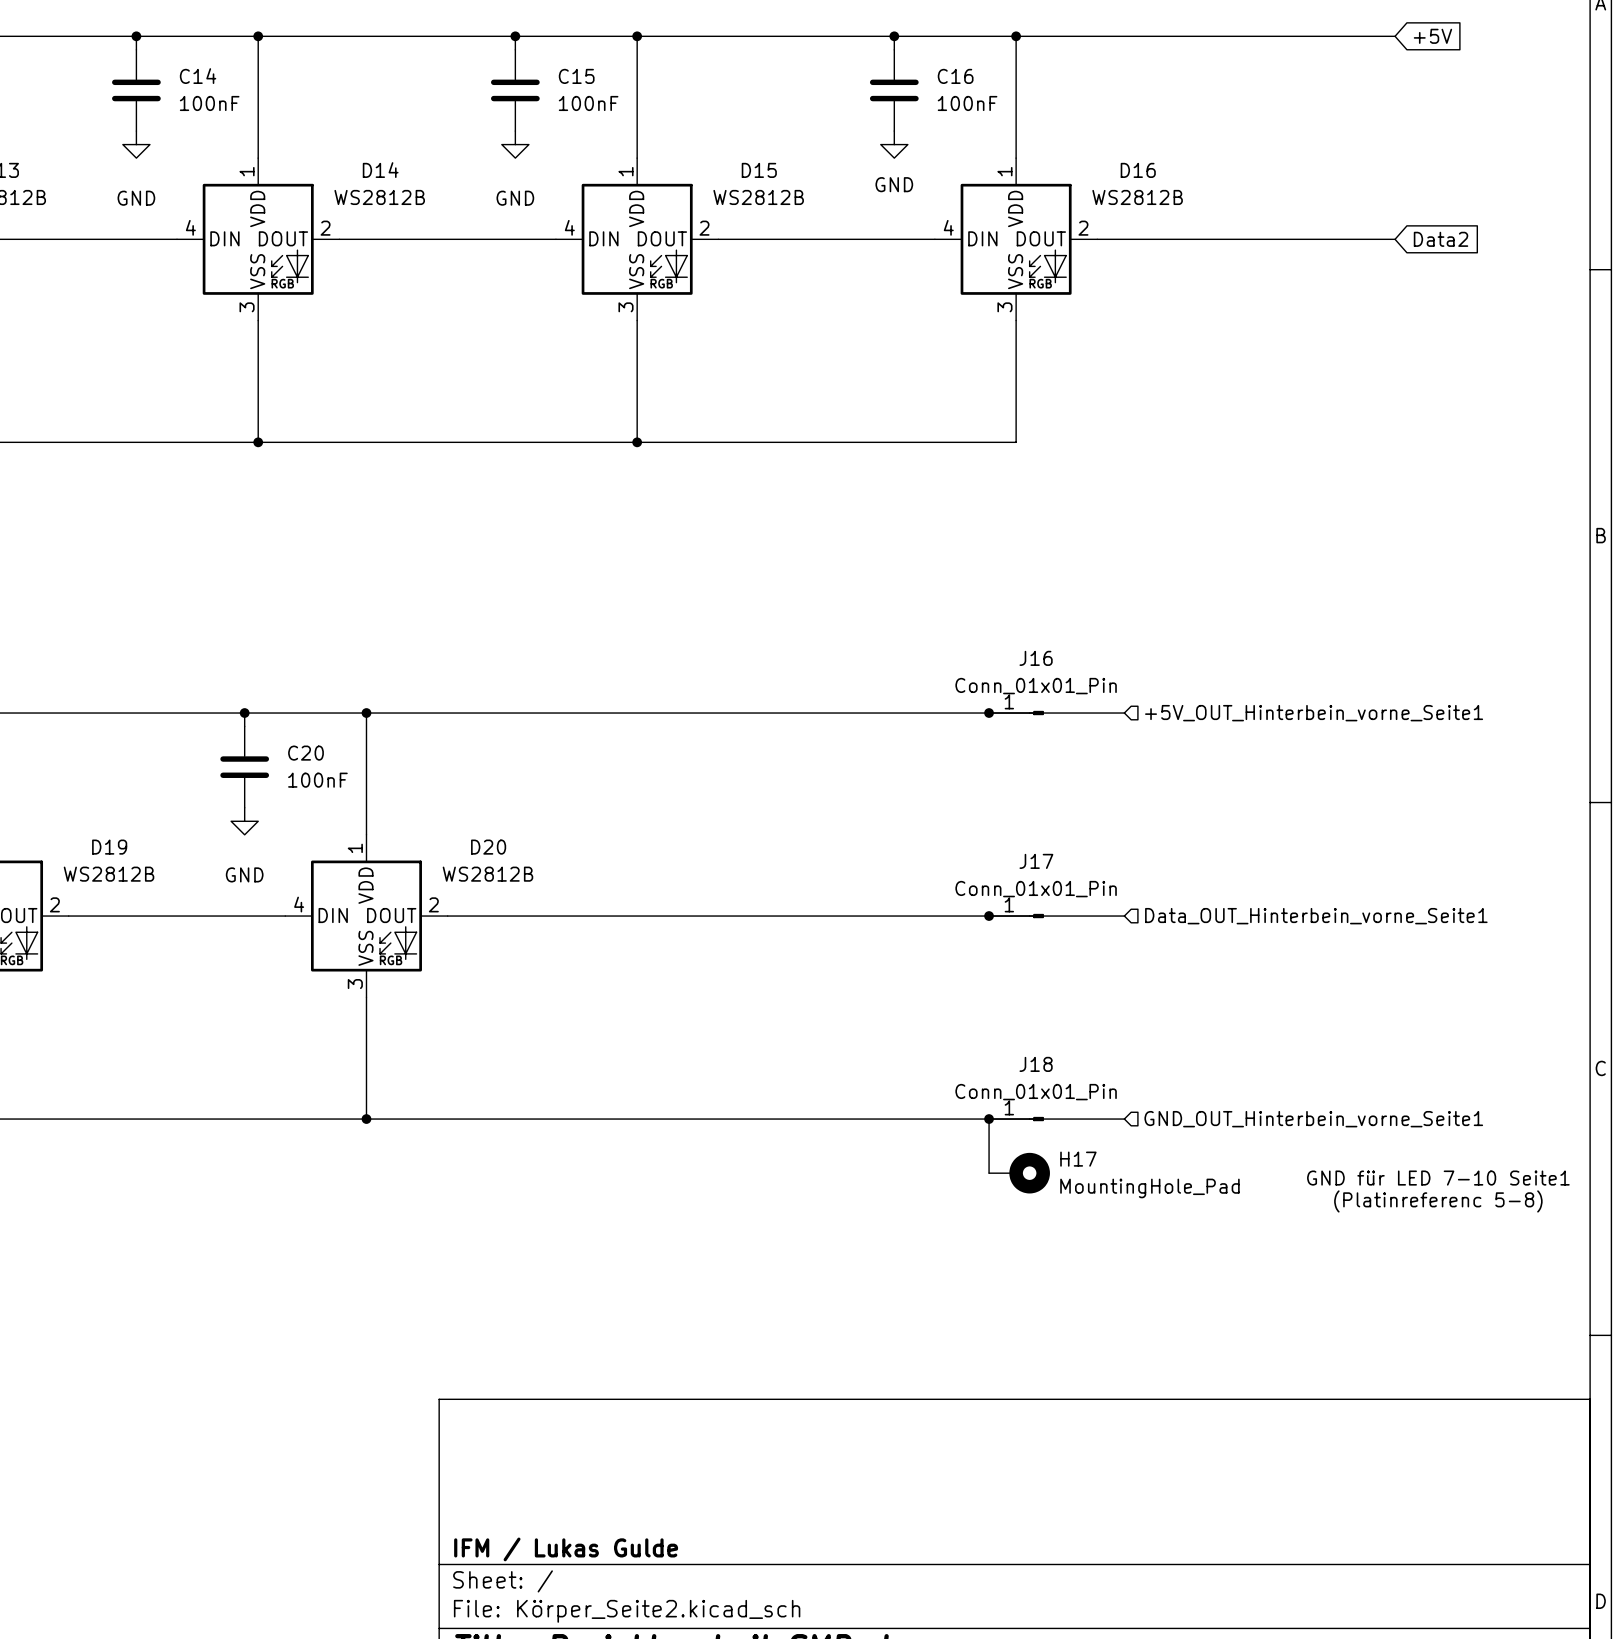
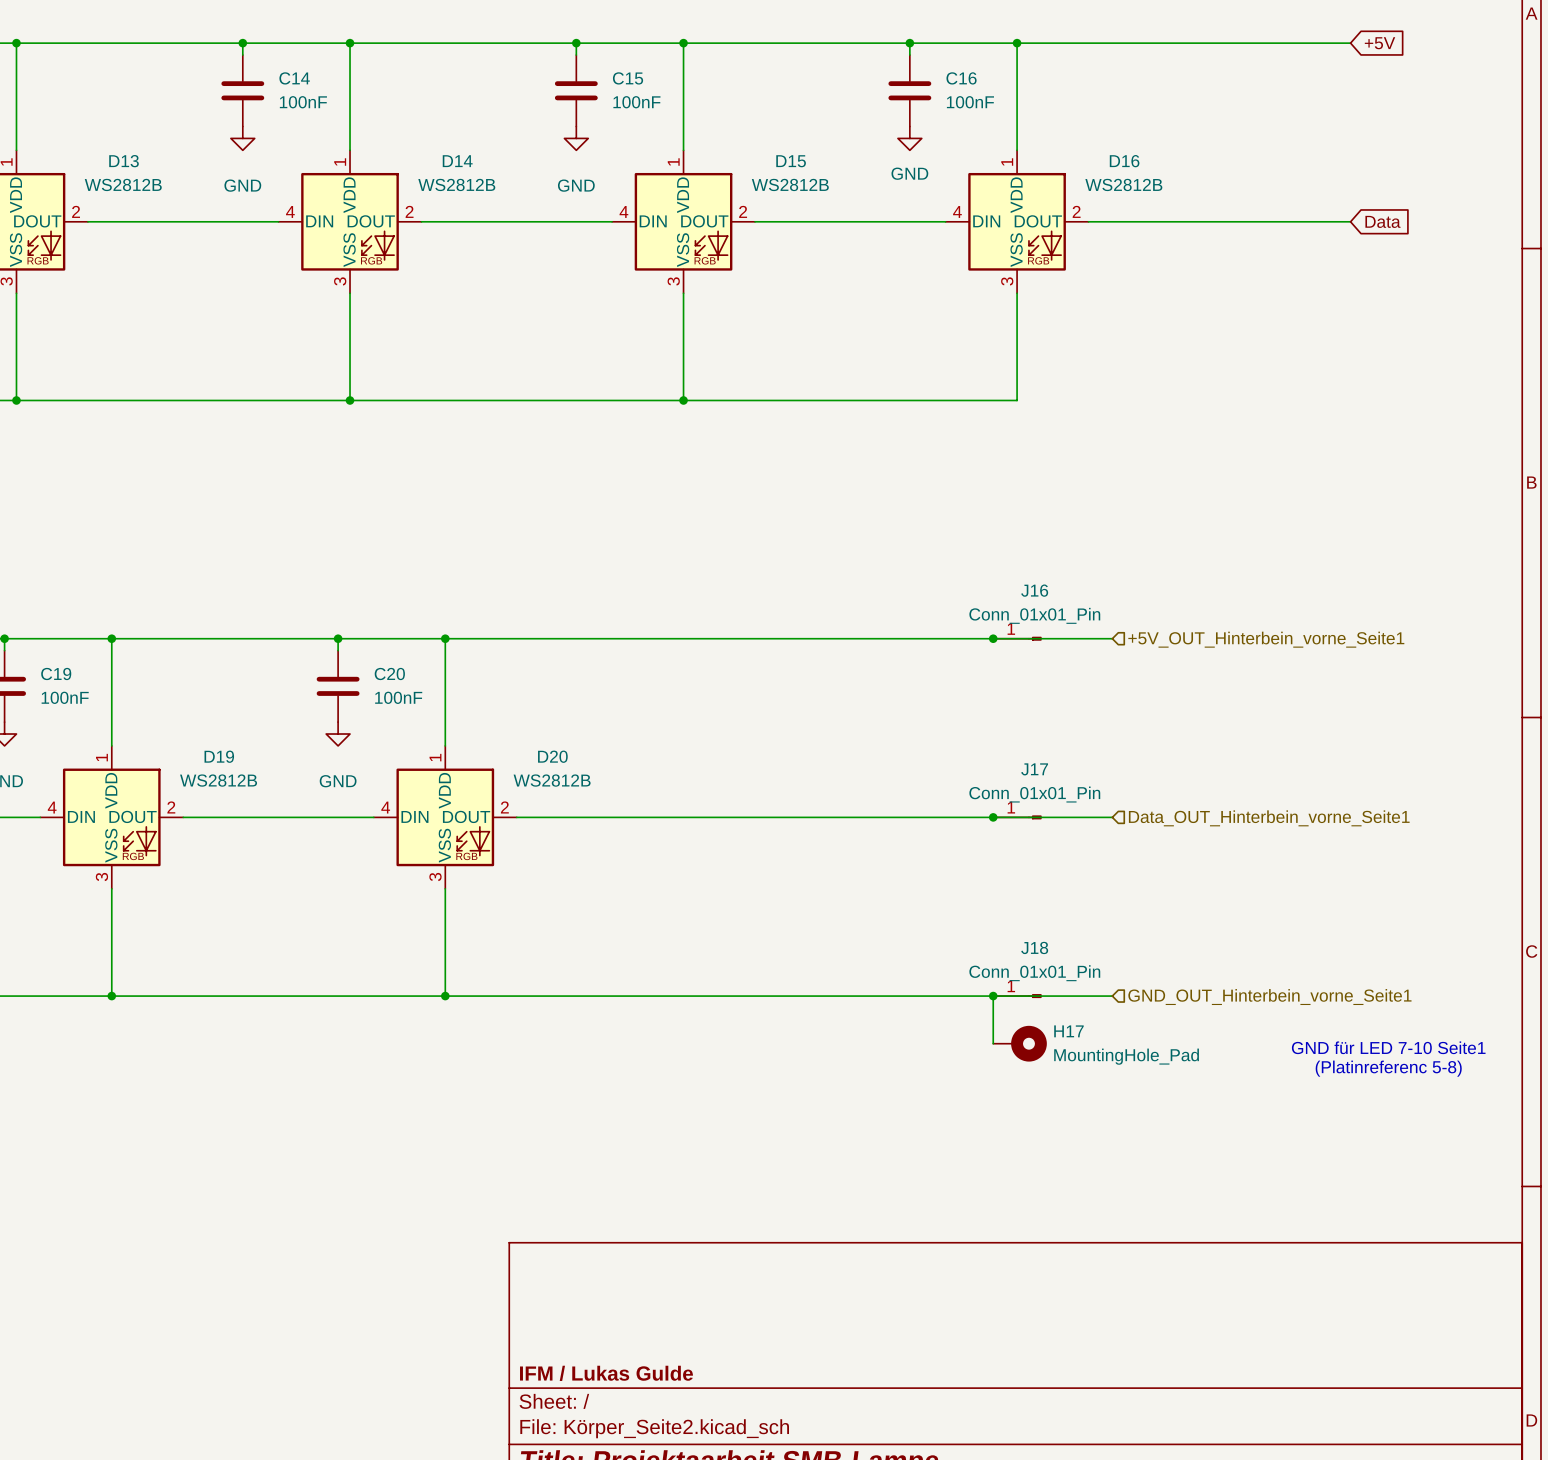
global label: Data2 (1441, 239) -> Data (1382, 221)

